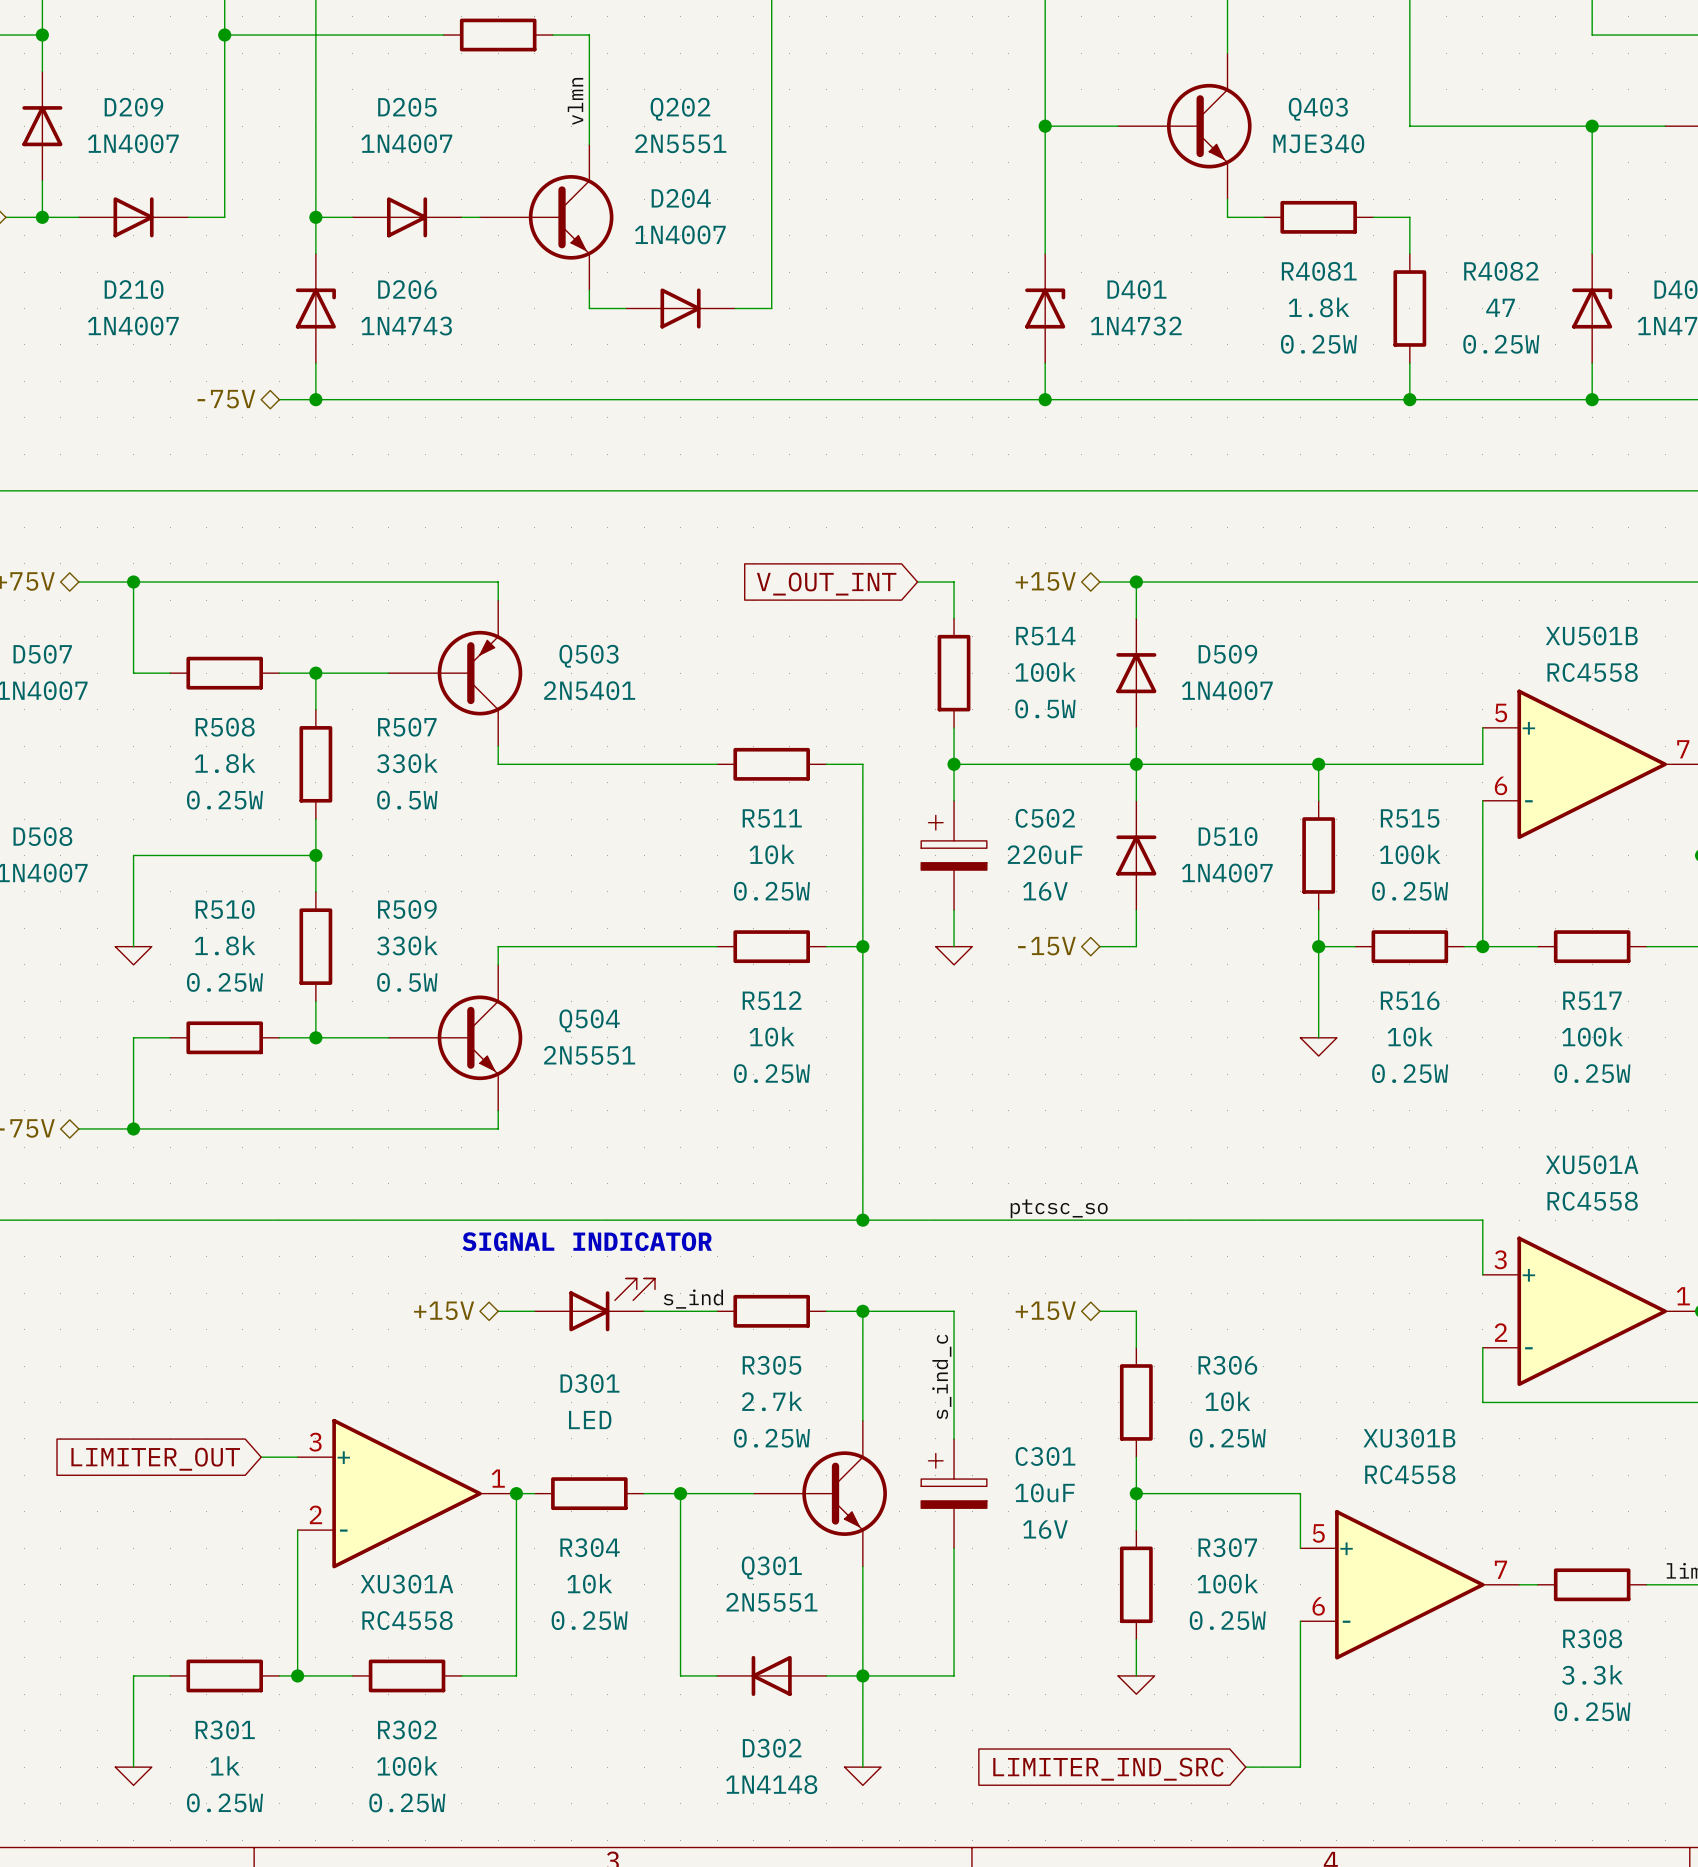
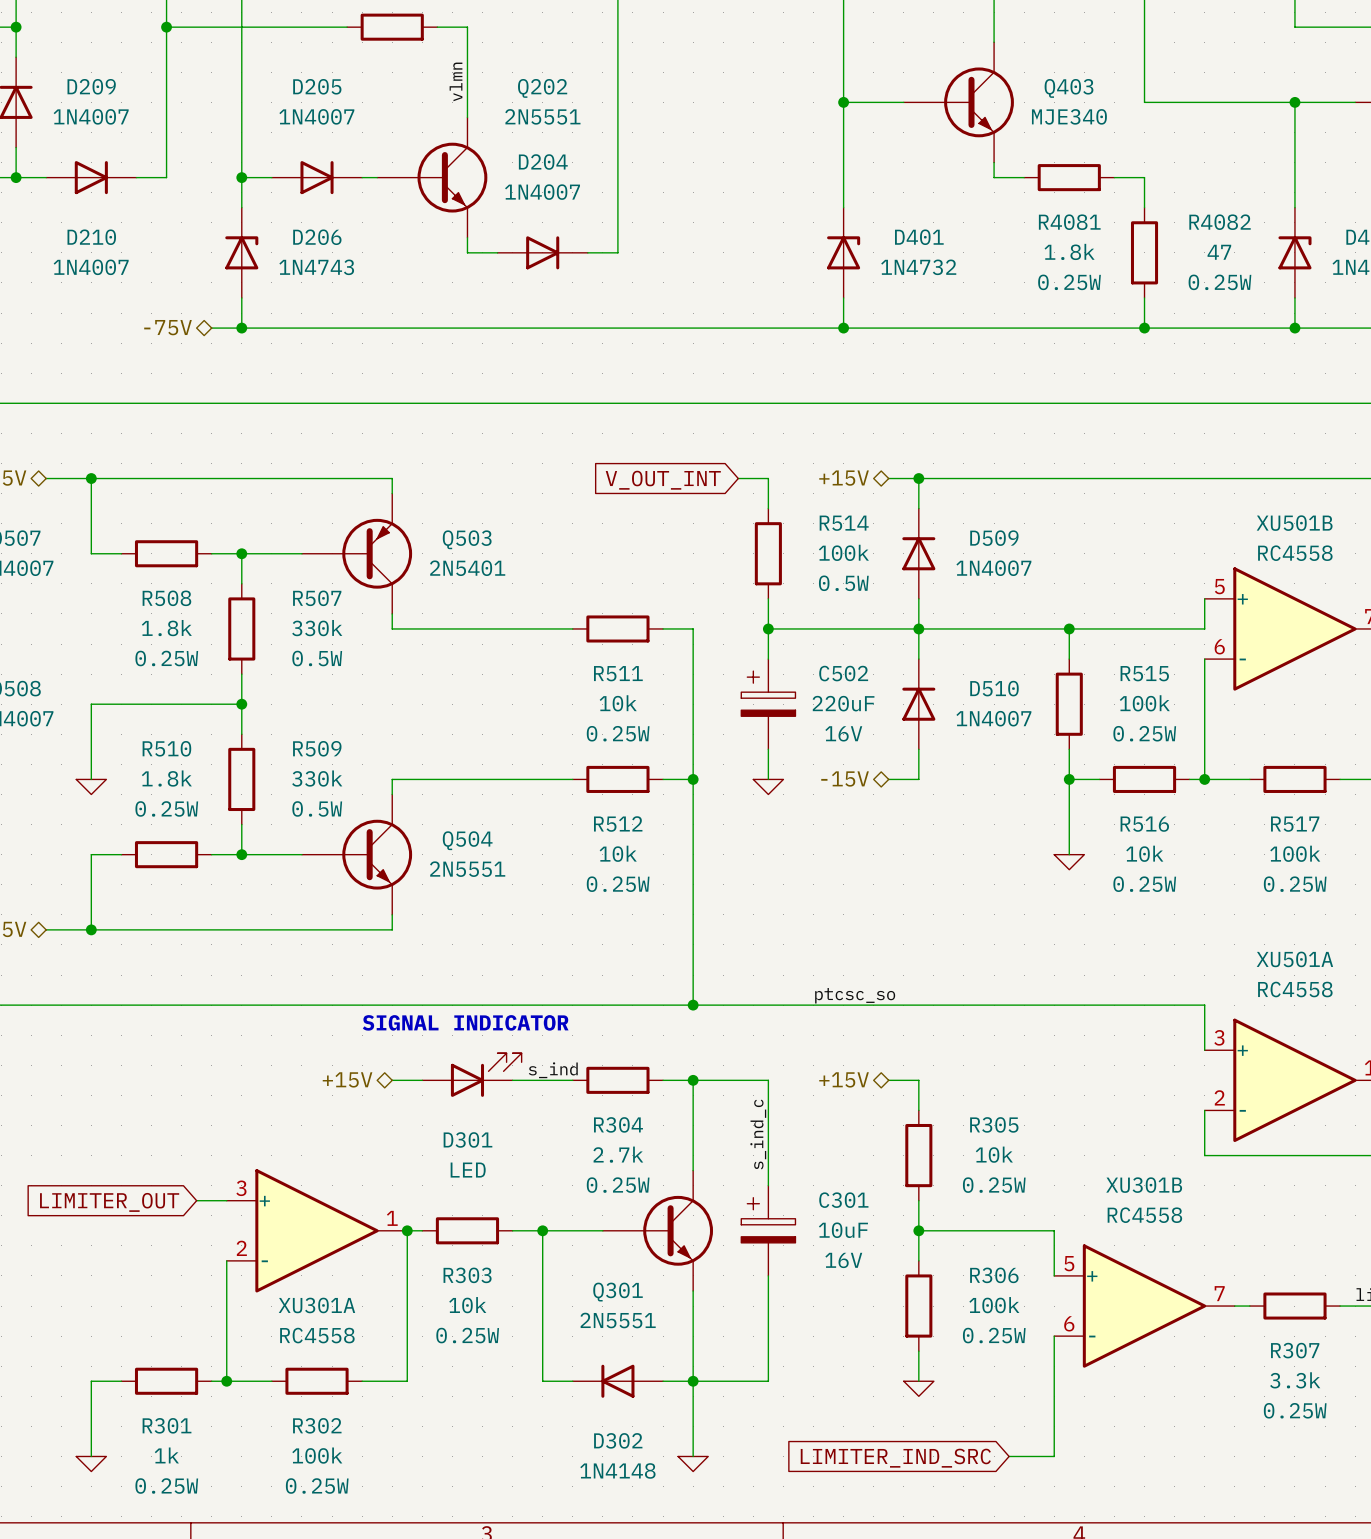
R305 name: R305 (771, 1365) -> R304 (618, 1124)
R306 name: R306 (1227, 1365) -> R305 (994, 1124)
R304 name: R304 (590, 1547) -> R303 (467, 1275)
R307 name: R307 (1227, 1547) -> R306 (994, 1275)
R308 name: R308 (1592, 1638) -> R307 (1295, 1350)

